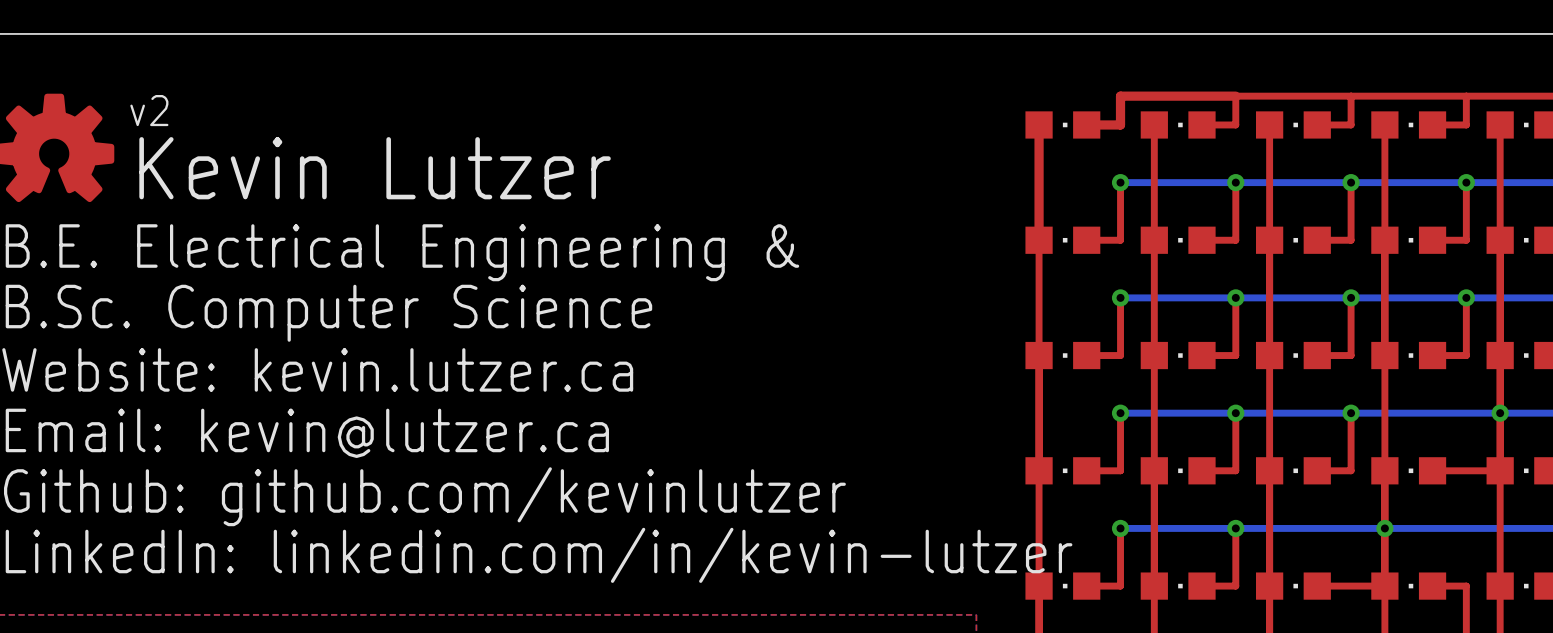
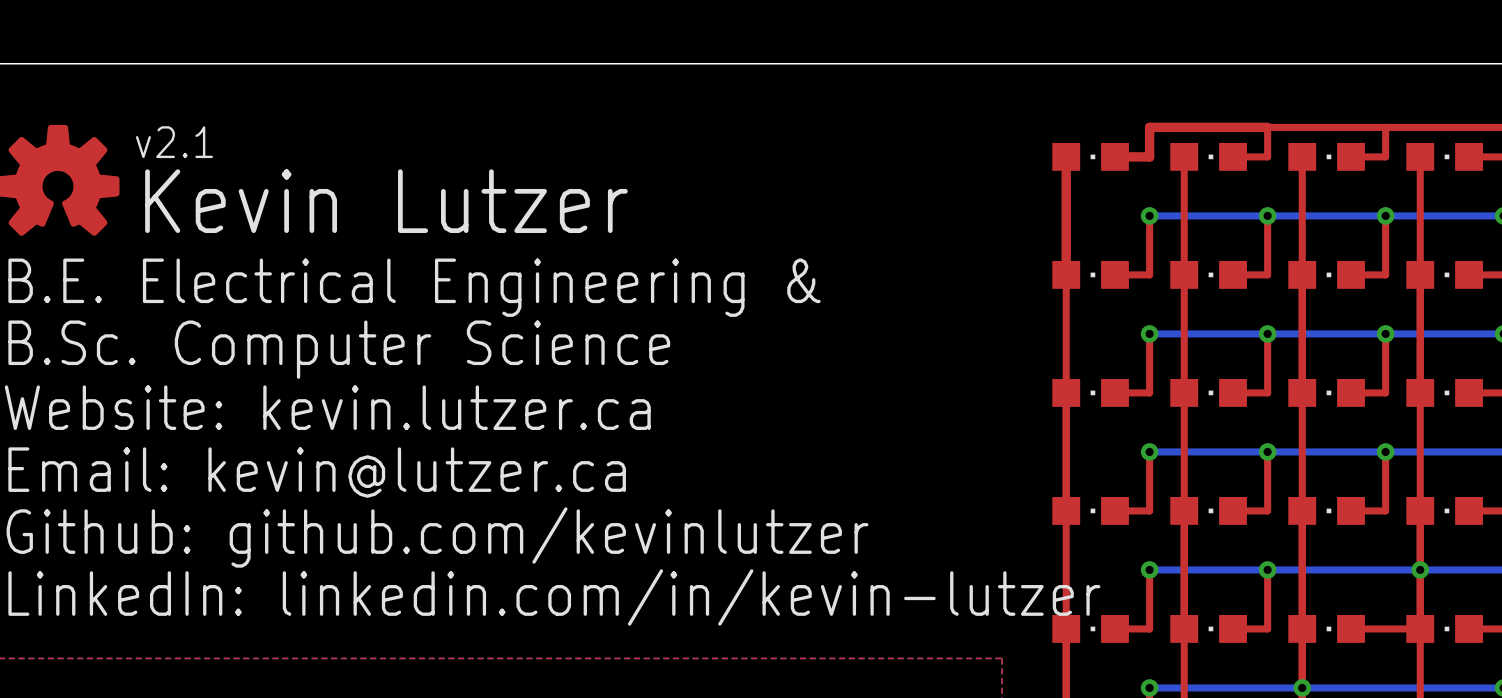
text: v2 (149, 110) -> v2.1 (174, 142)

